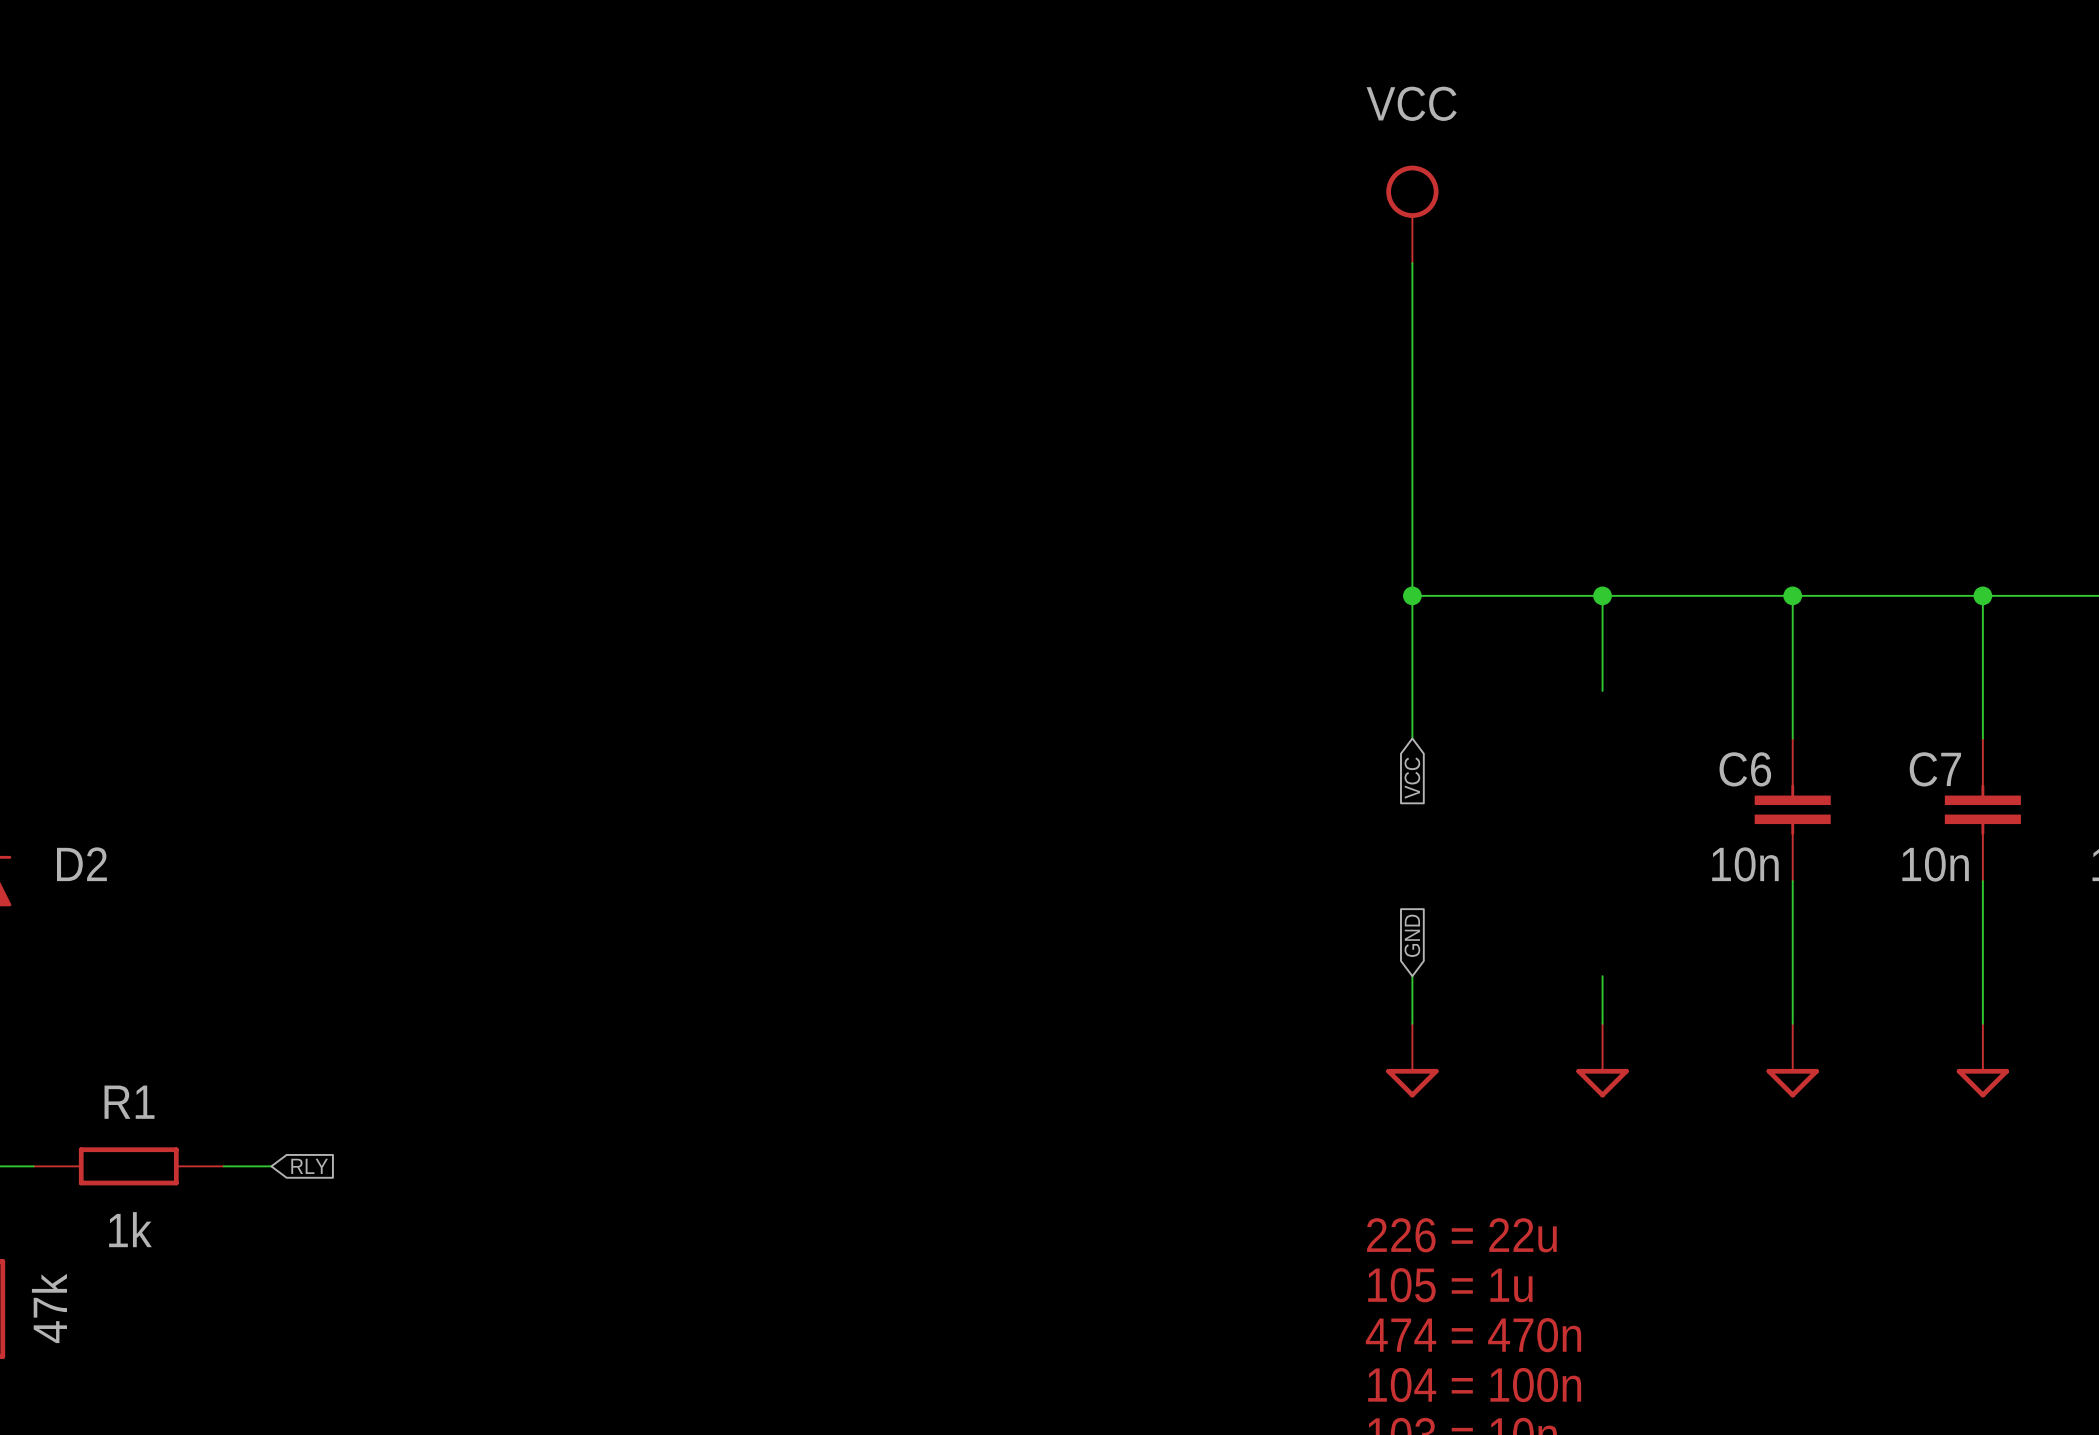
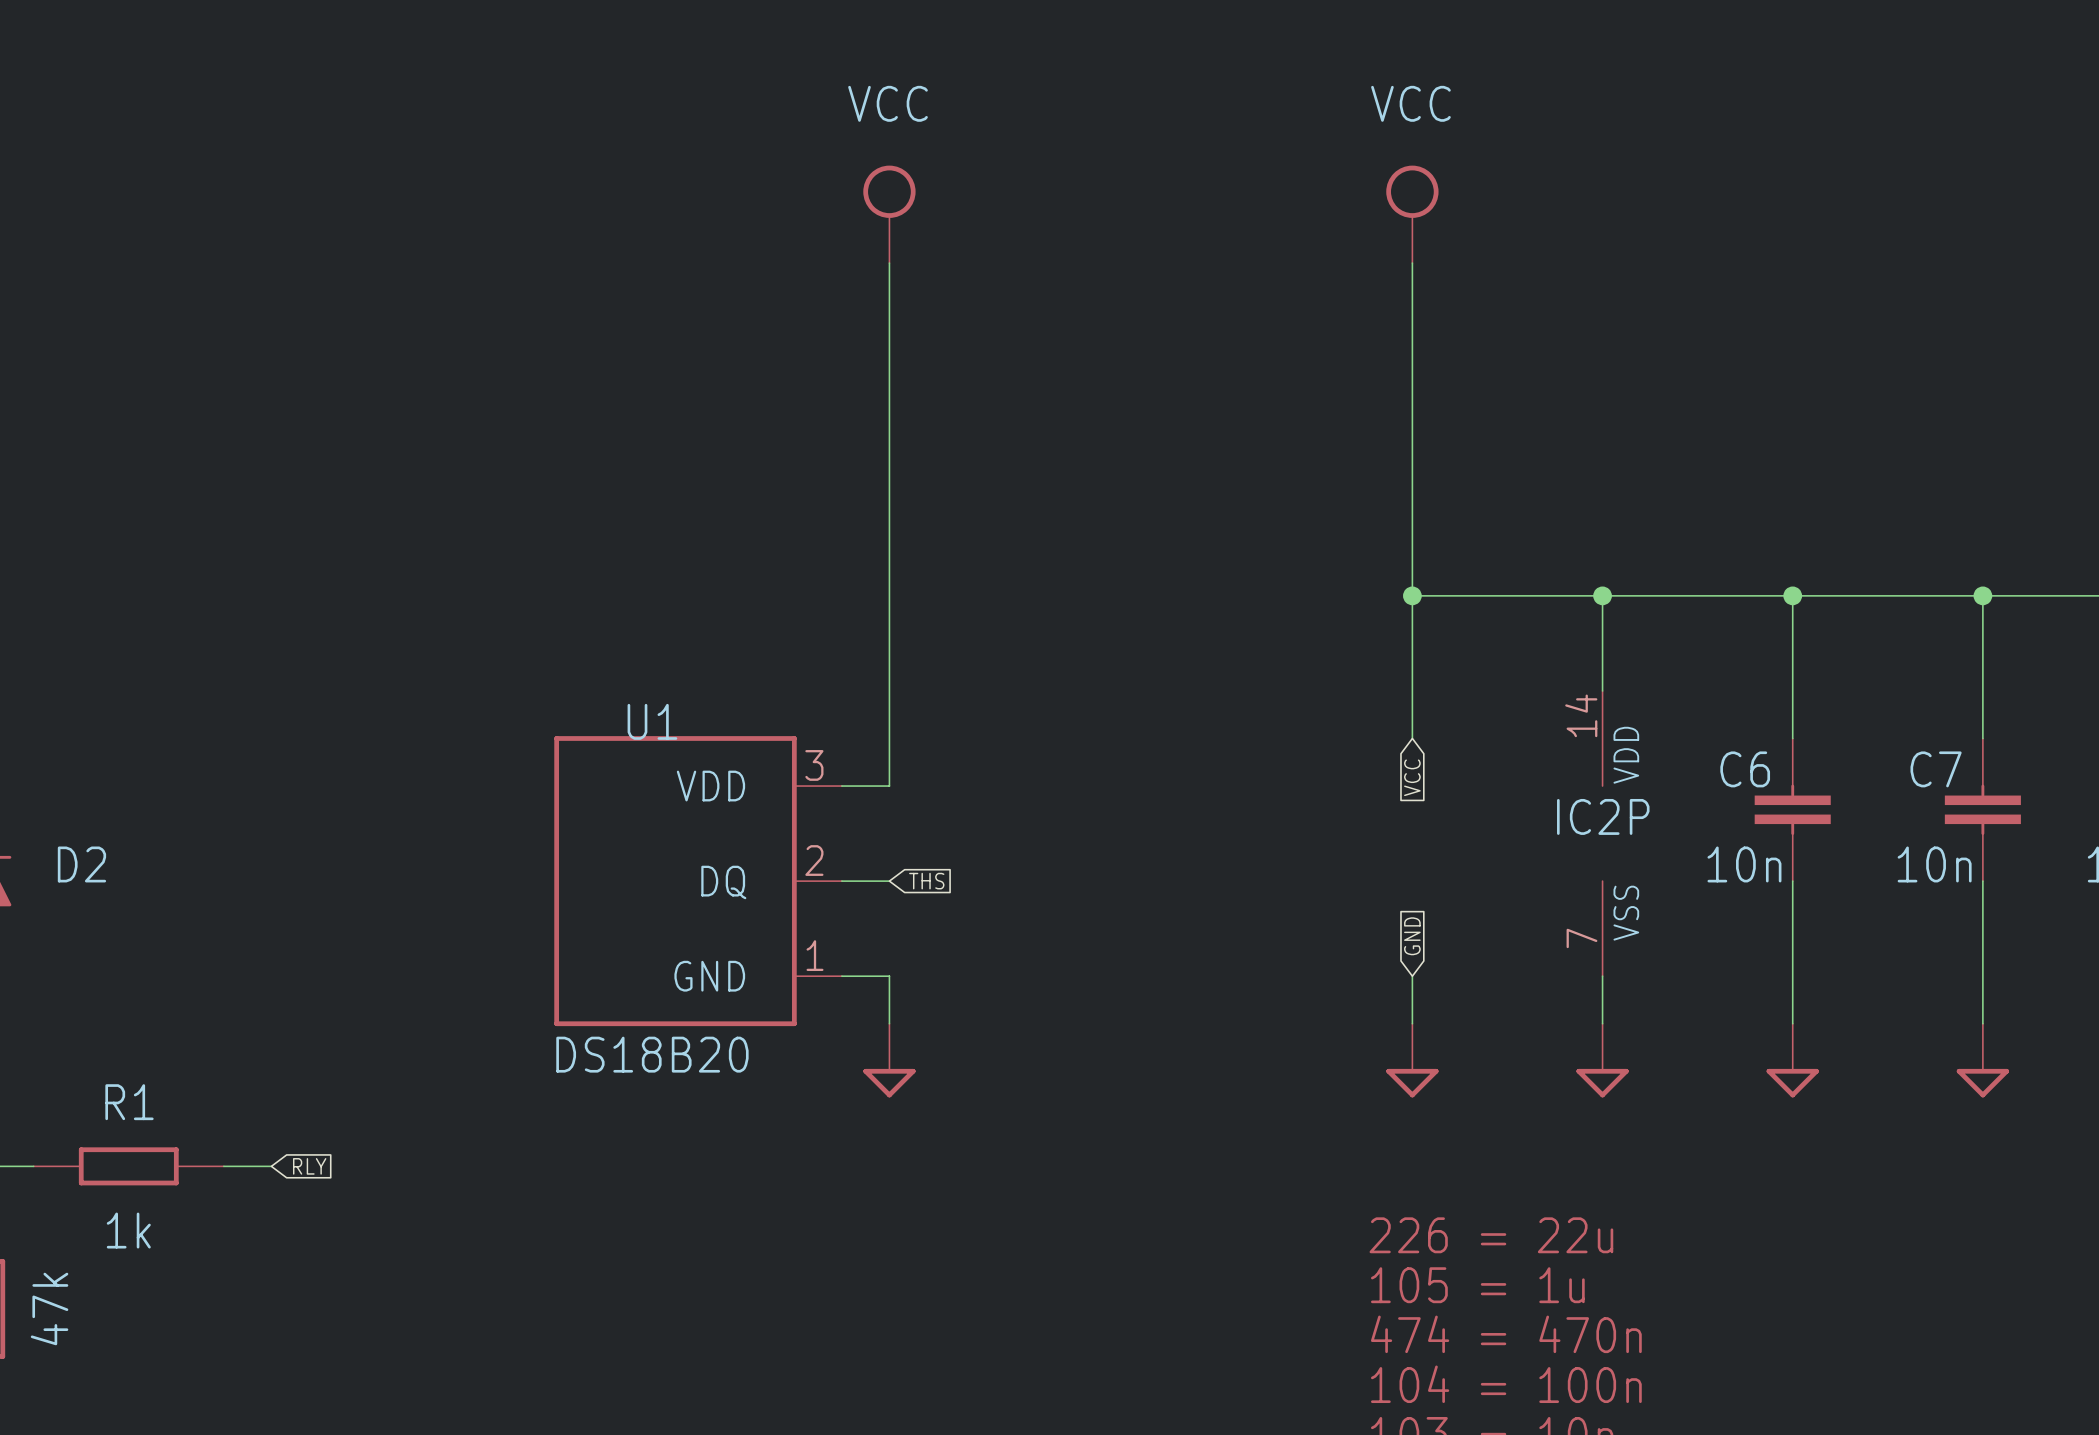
power symbol: none -> VCC (889, 214)
wire: none -> (889, 263) (889, 786) (841, 786)
IC2P: none -> (1602, 833)
U1: none -> DS18B20 (698, 881)
wire: none -> (841, 881) (889, 881)
global label: none -> THS (926, 881)
wire: none -> (841, 976) (889, 976) (889, 1023)
power symbol: none -> (889, 1060)

